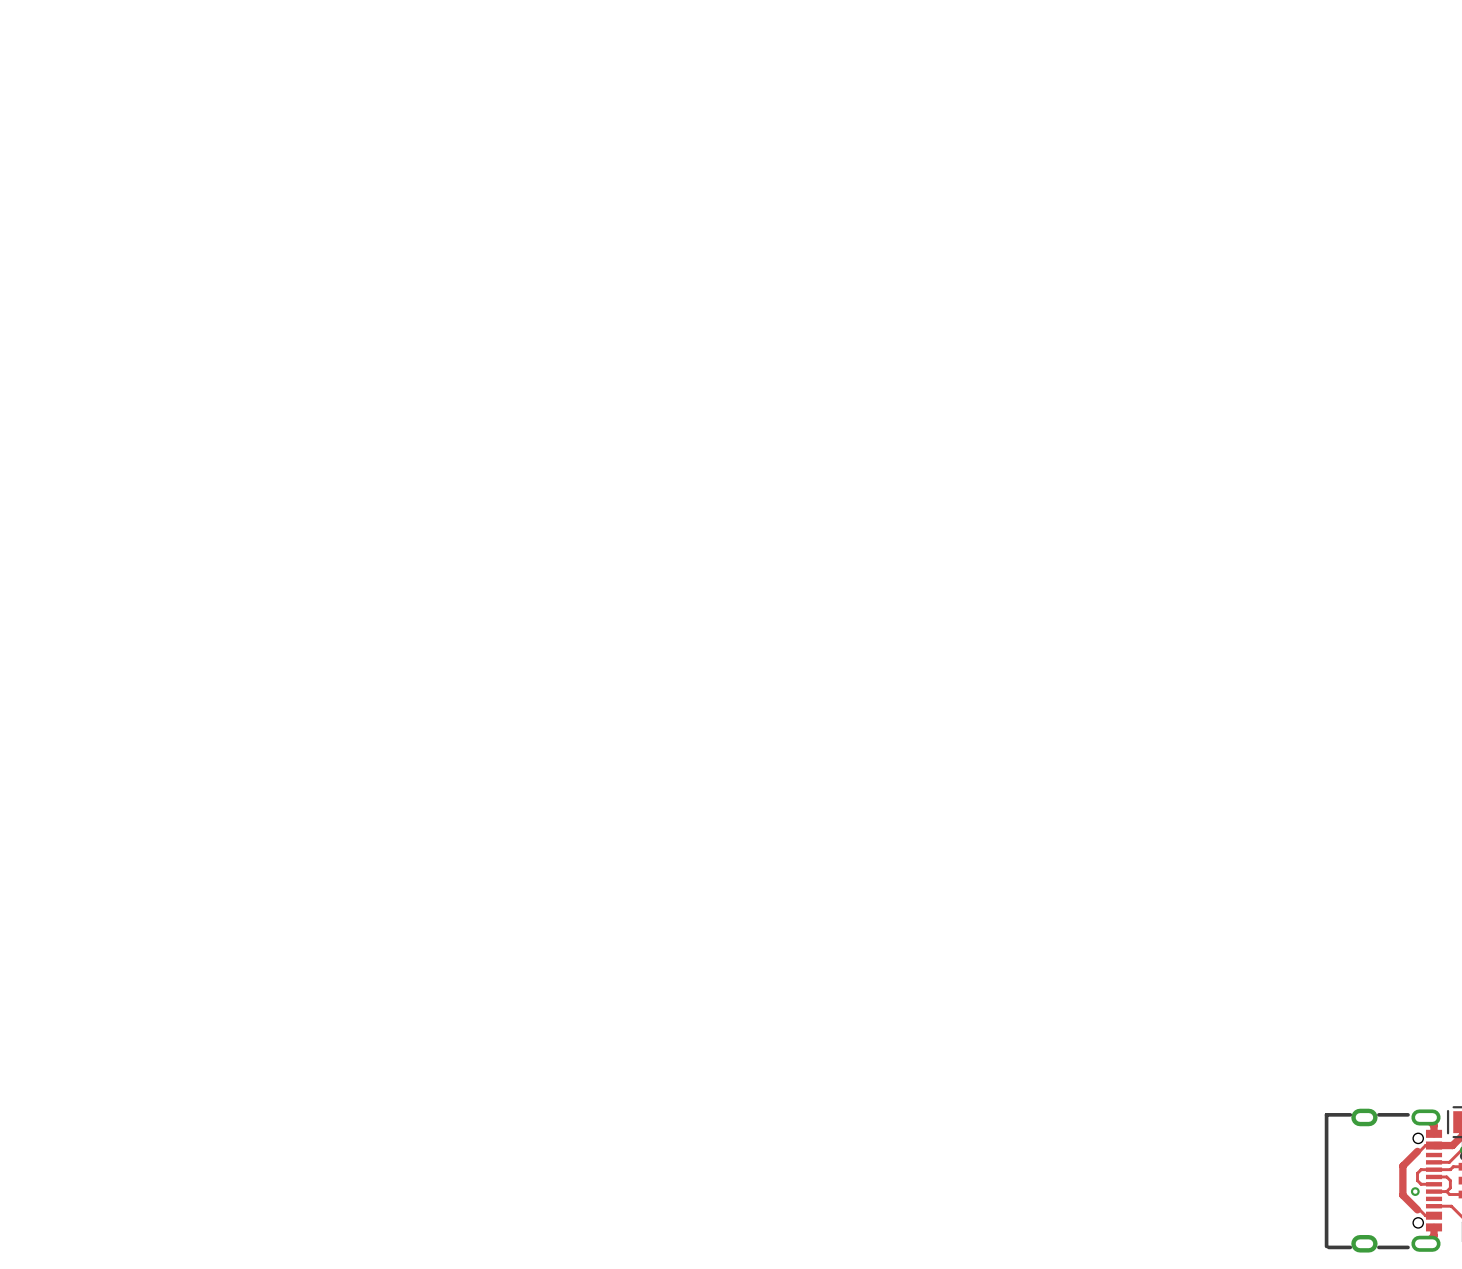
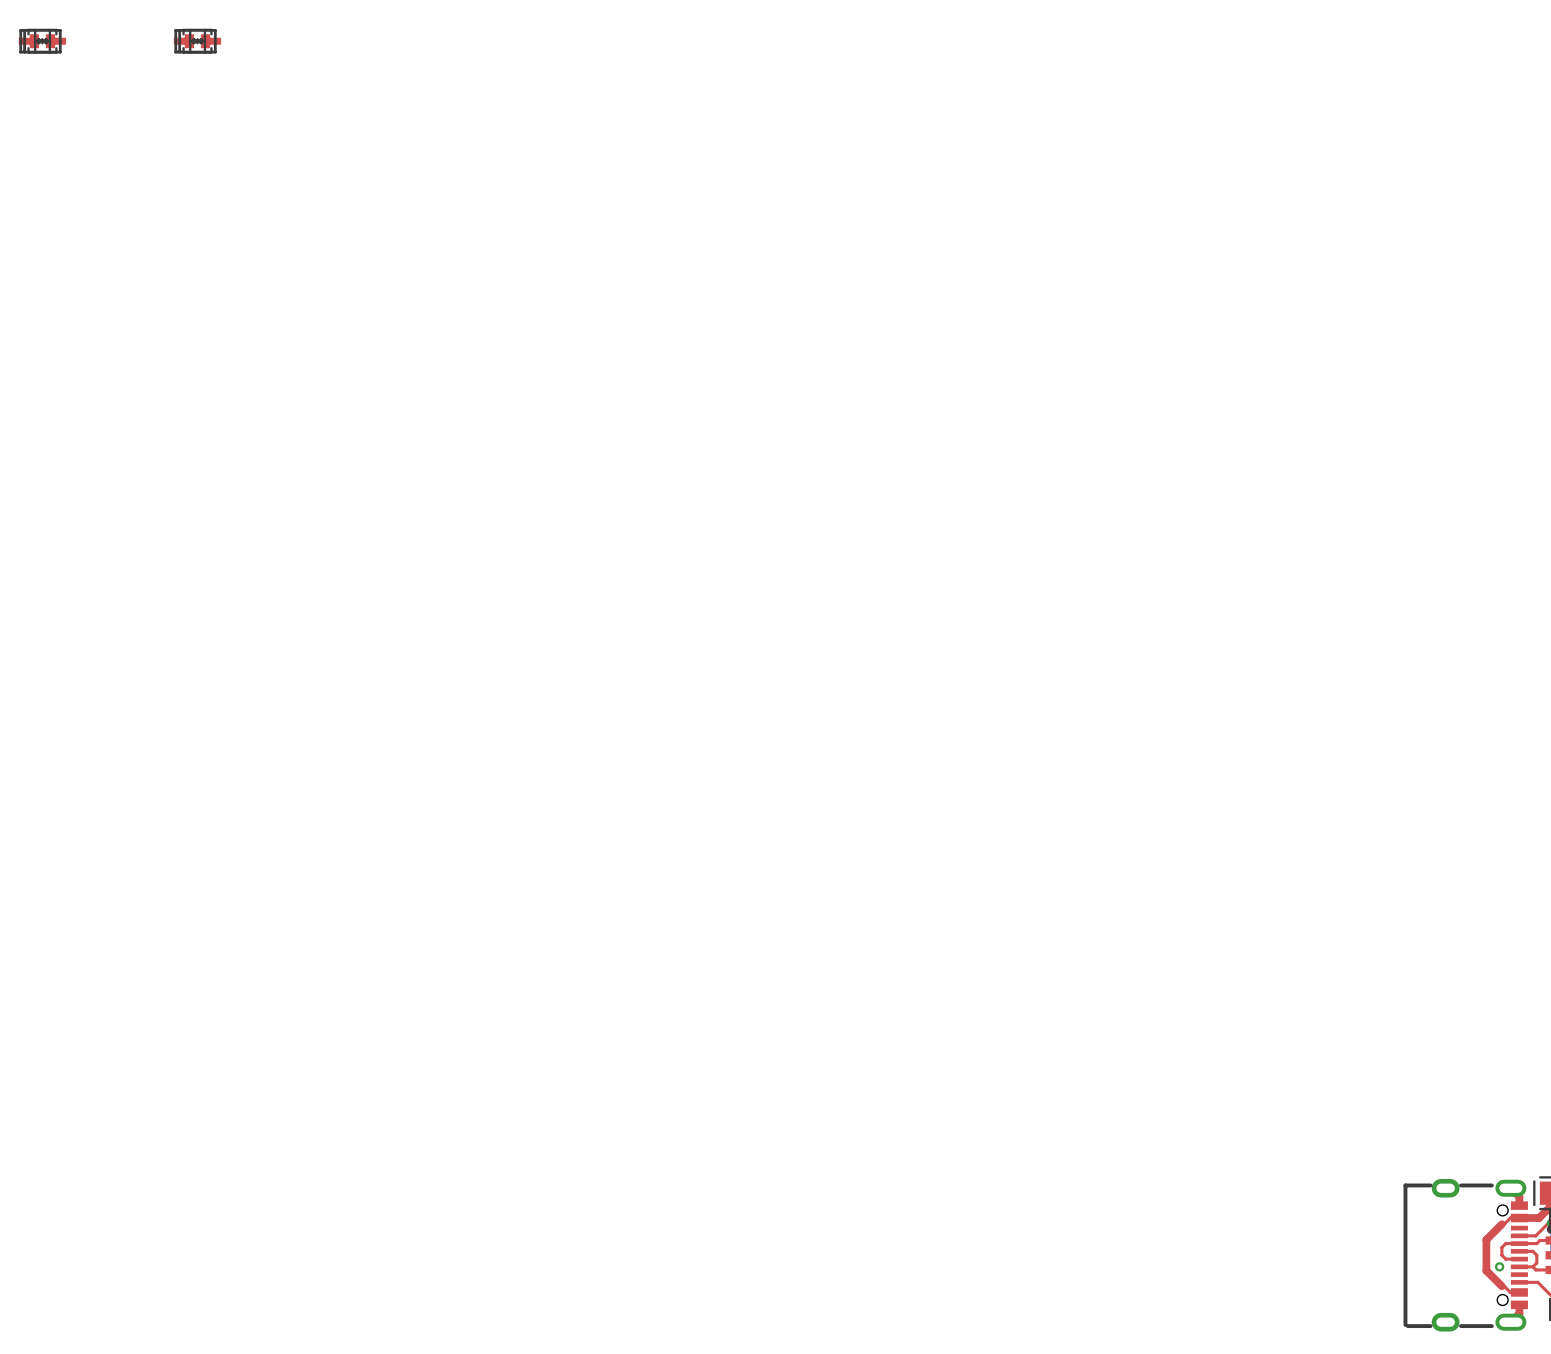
part: none -> (40, 41)
part: none -> (42, 41)
part: none -> (195, 41)
part: none -> (197, 41)

